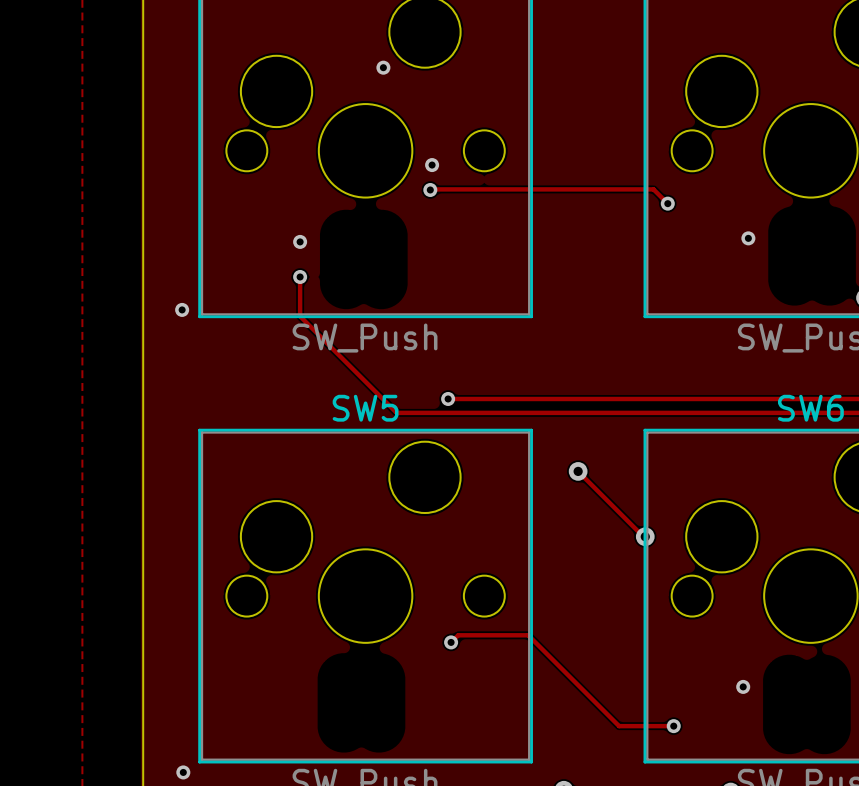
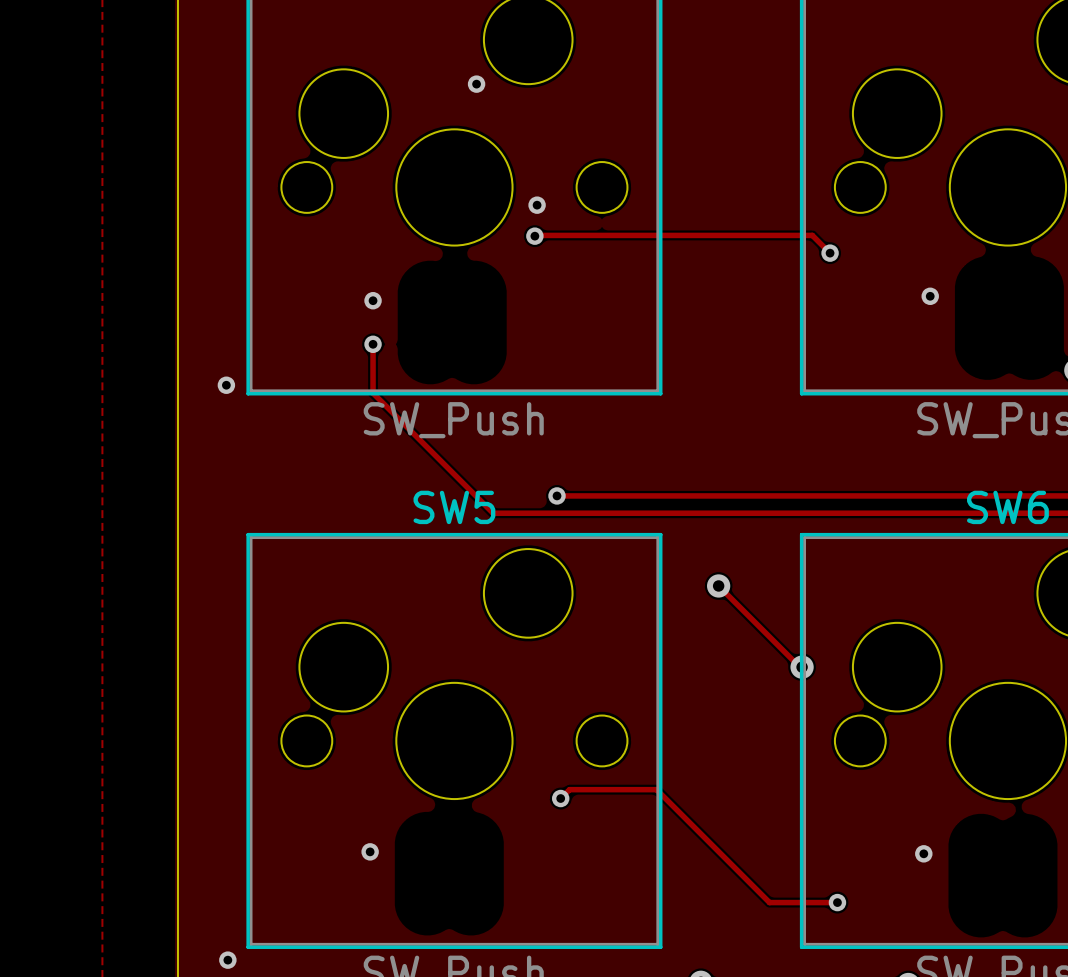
via: none -> (370, 851)

